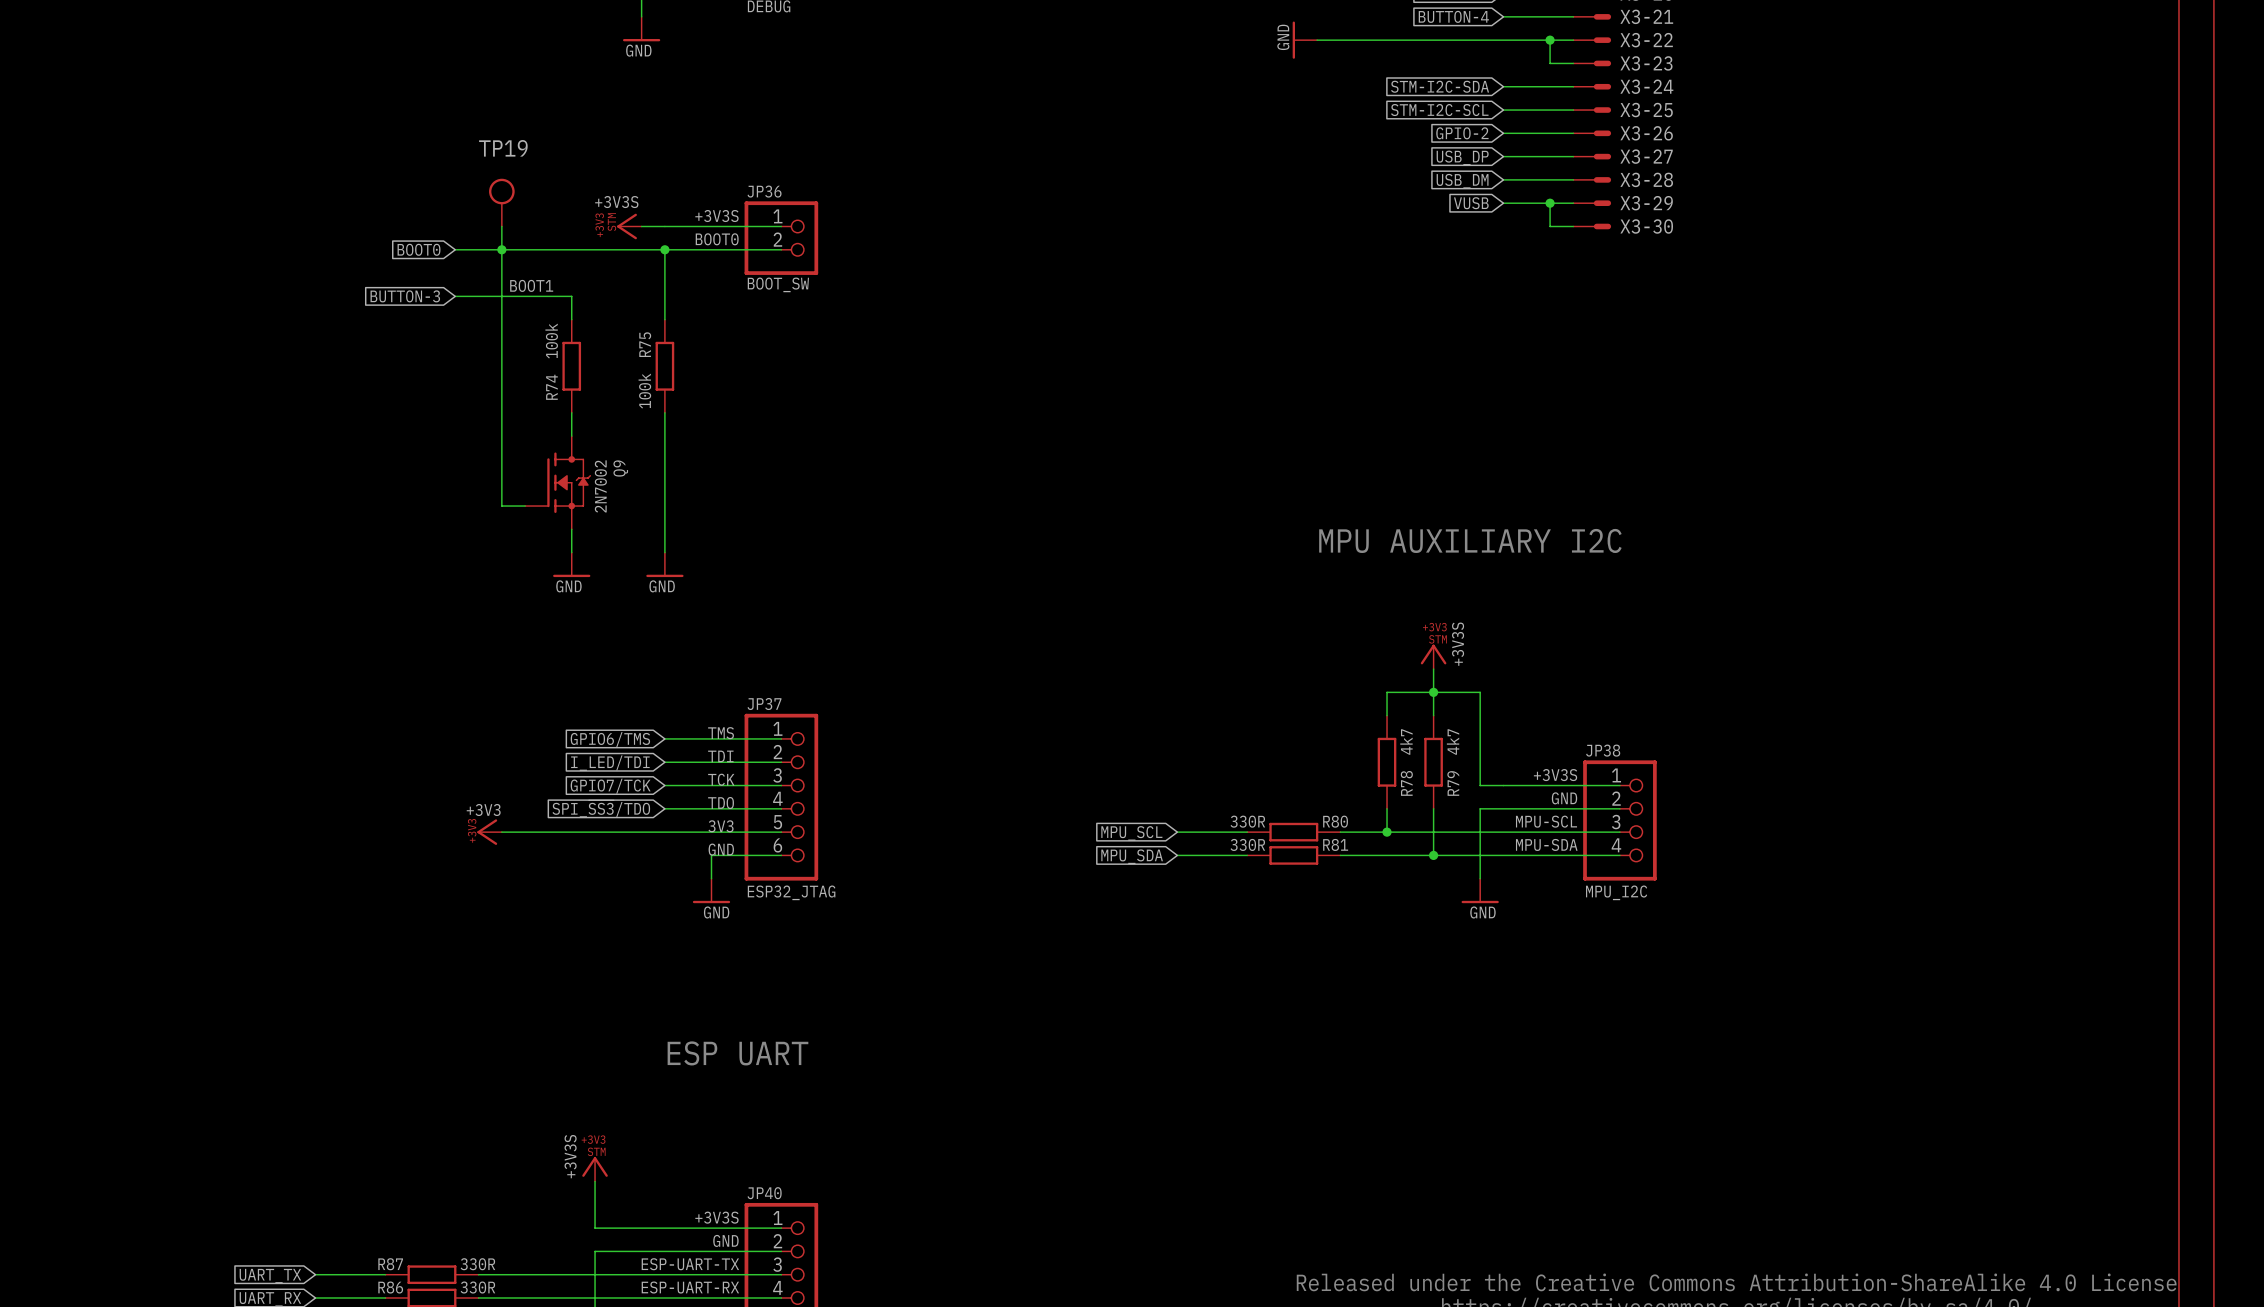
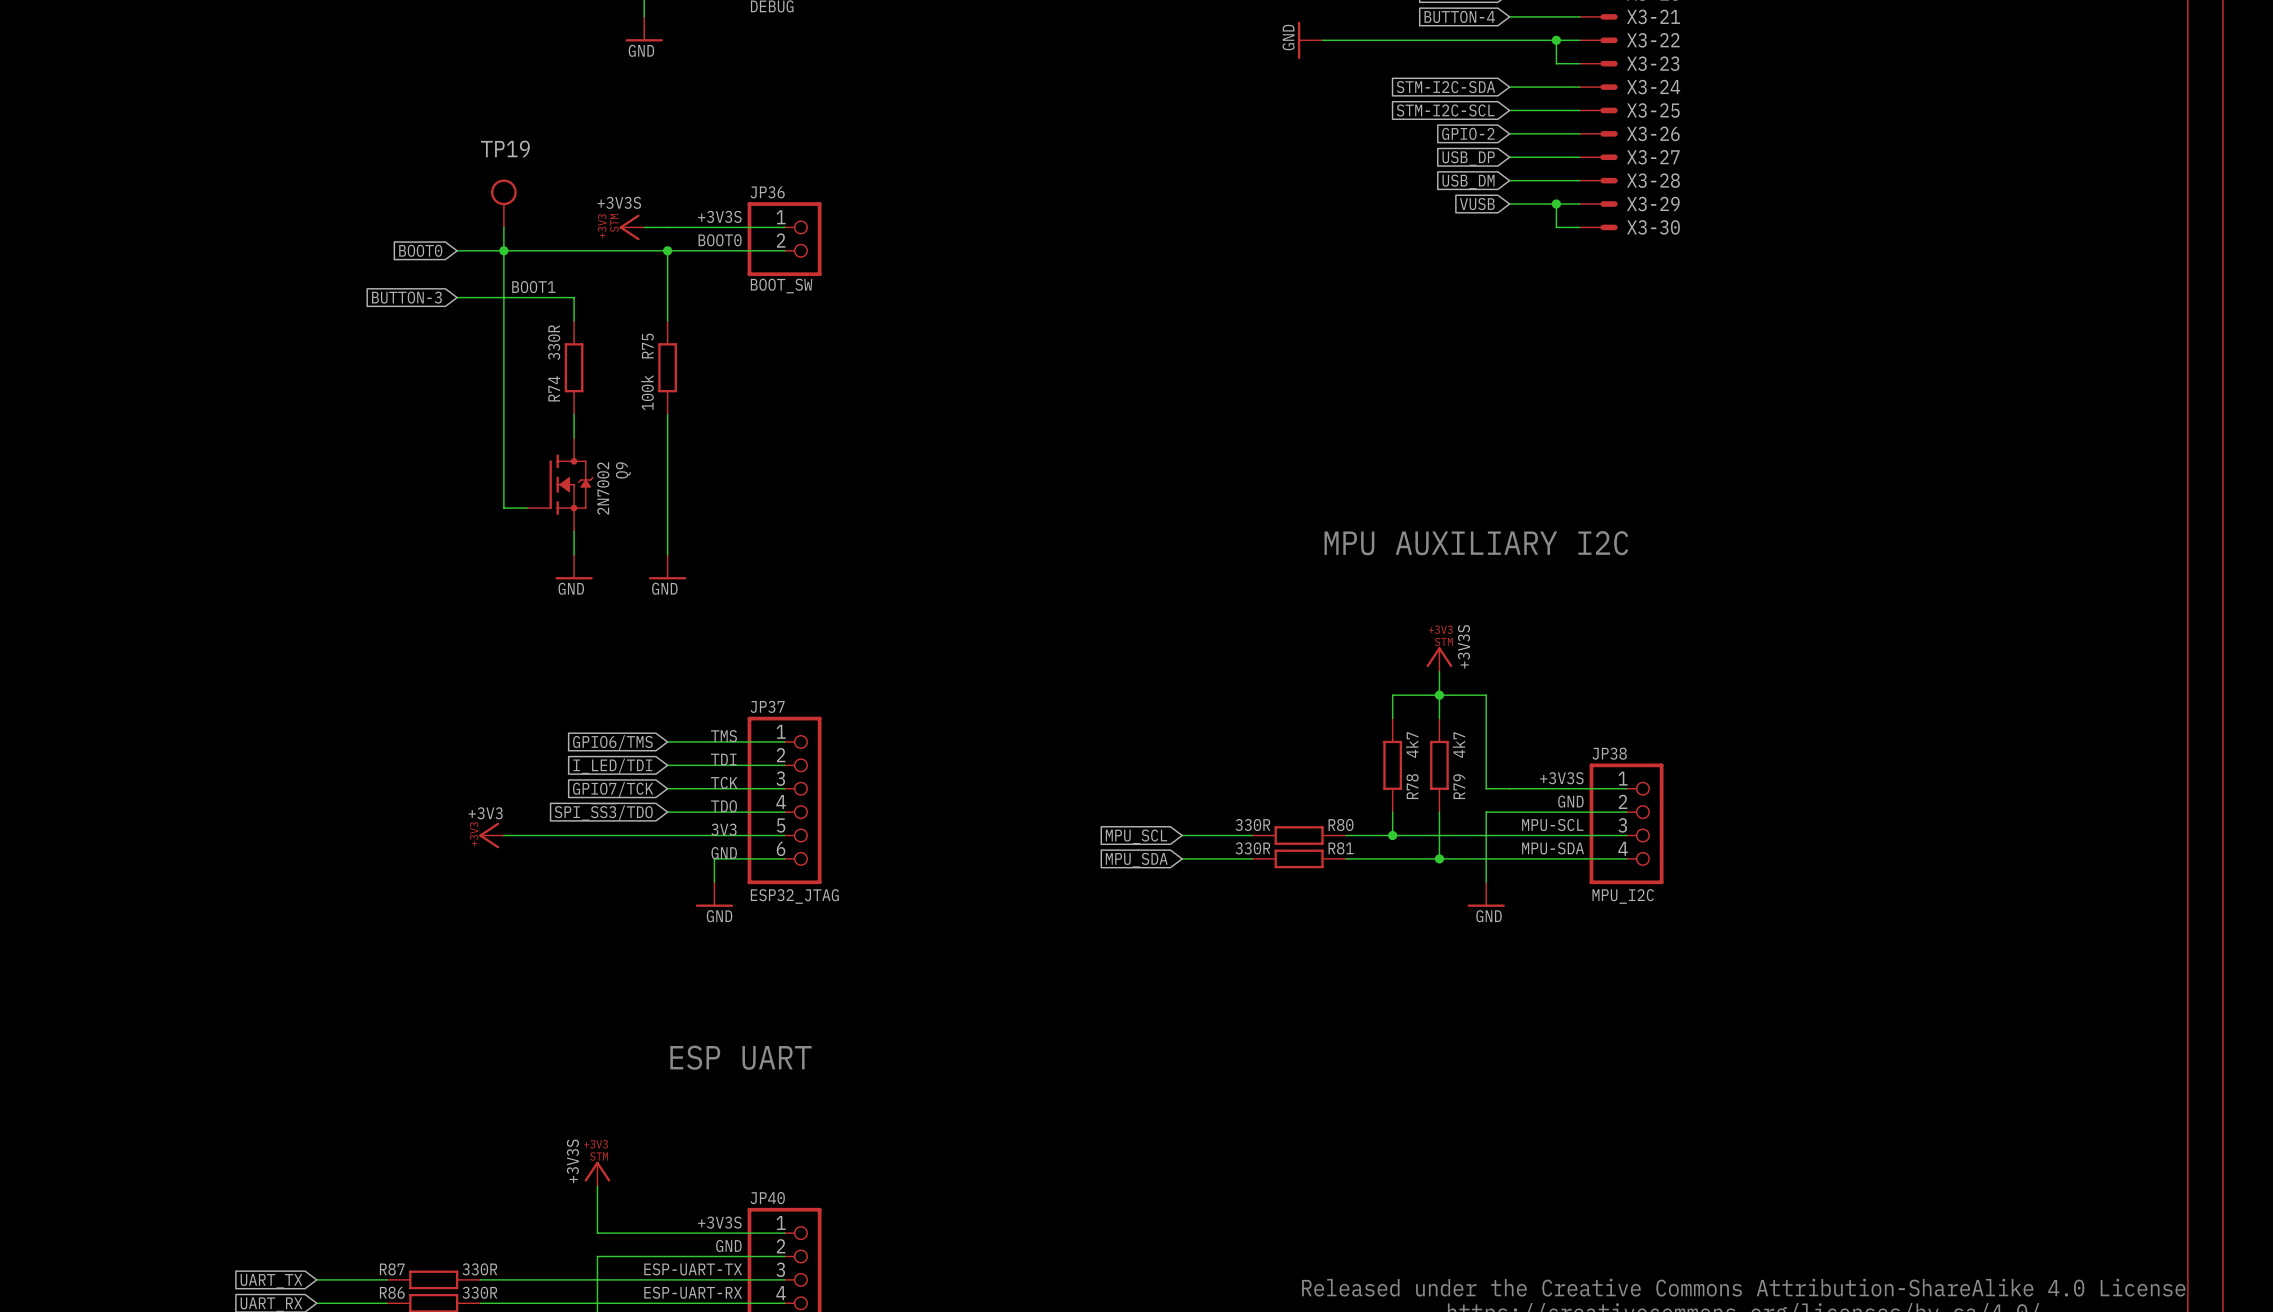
R74 value: 100k (551, 341) -> 330R (554, 342)

